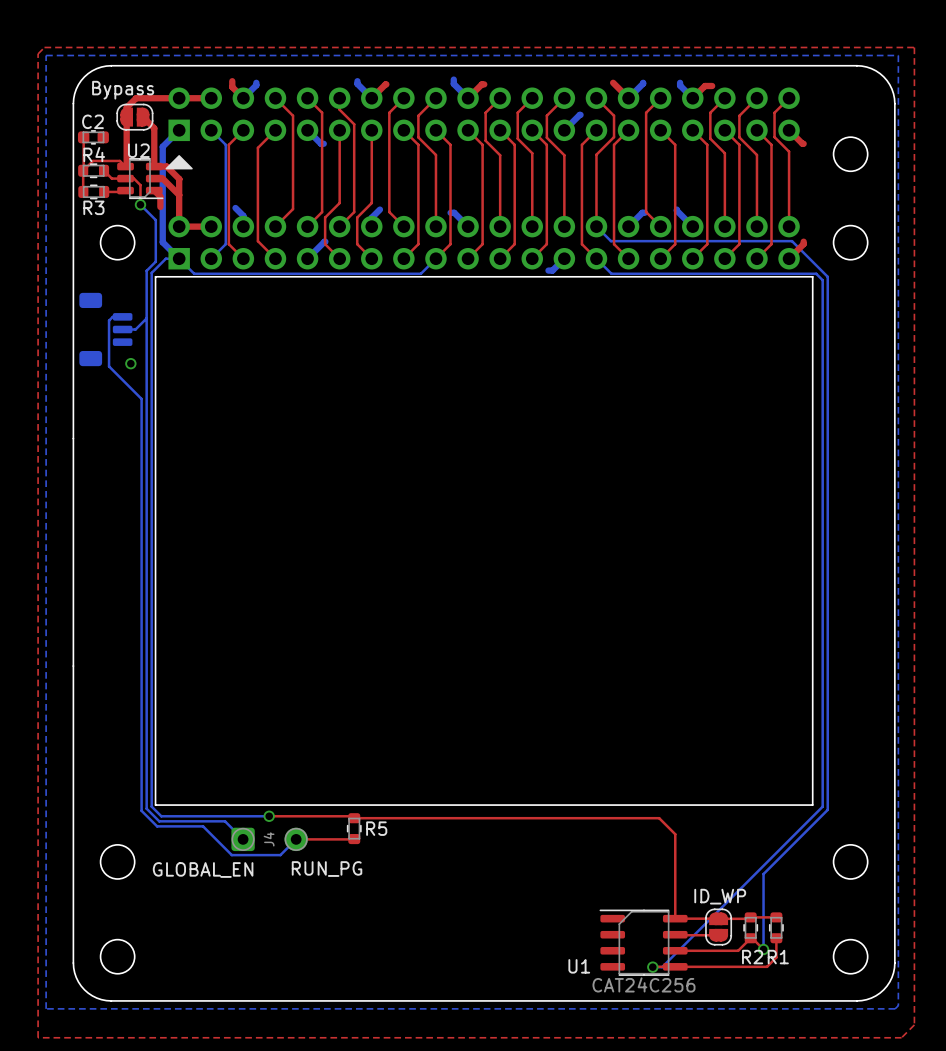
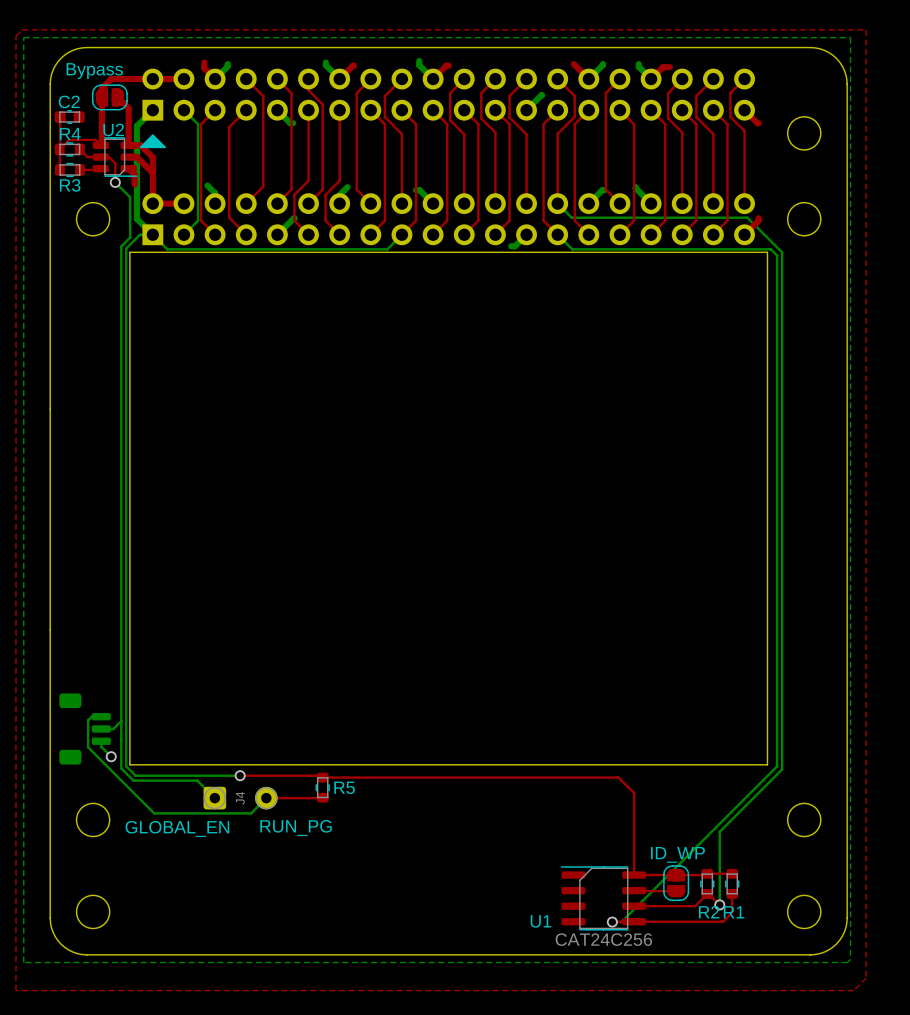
bottom track: (122, 316) (112, 316) (109, 320) (109, 366) (141, 398) (141, 810) (157, 826) (203, 826) (231, 855) -> (101, 716) (91, 716) (88, 720) (88, 747) (154, 813) (203, 813)
bottom track: (146, 318) (135, 329) (122, 329) -> none
part: (105, 329) -> none
via: (130, 363) -> none
bottom track: none -> (121, 721) (113, 728) (101, 728)
part: none -> (85, 728)
bottom track: none -> (101, 741) (101, 746) (111, 756)
via: none -> (111, 756)

